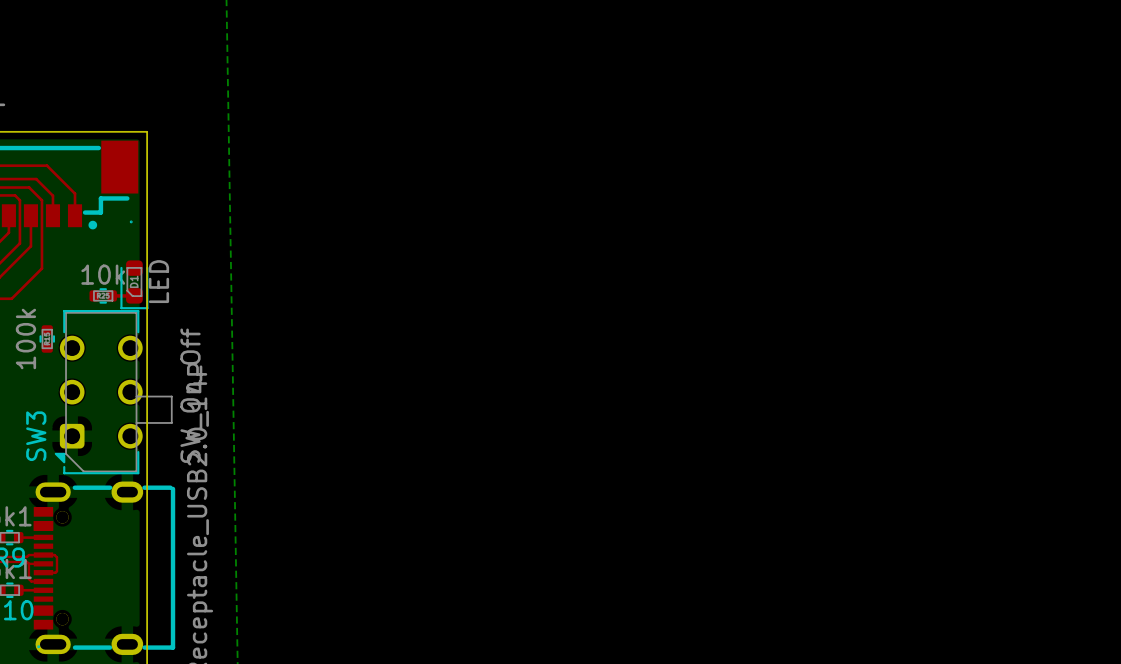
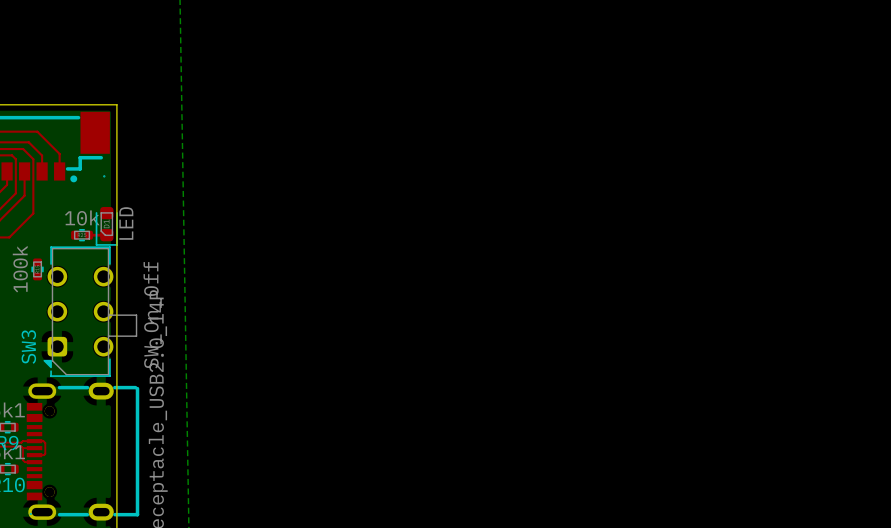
top track: (18, 537) (43, 537) -> none
top track: (18, 590) (43, 590) -> none

